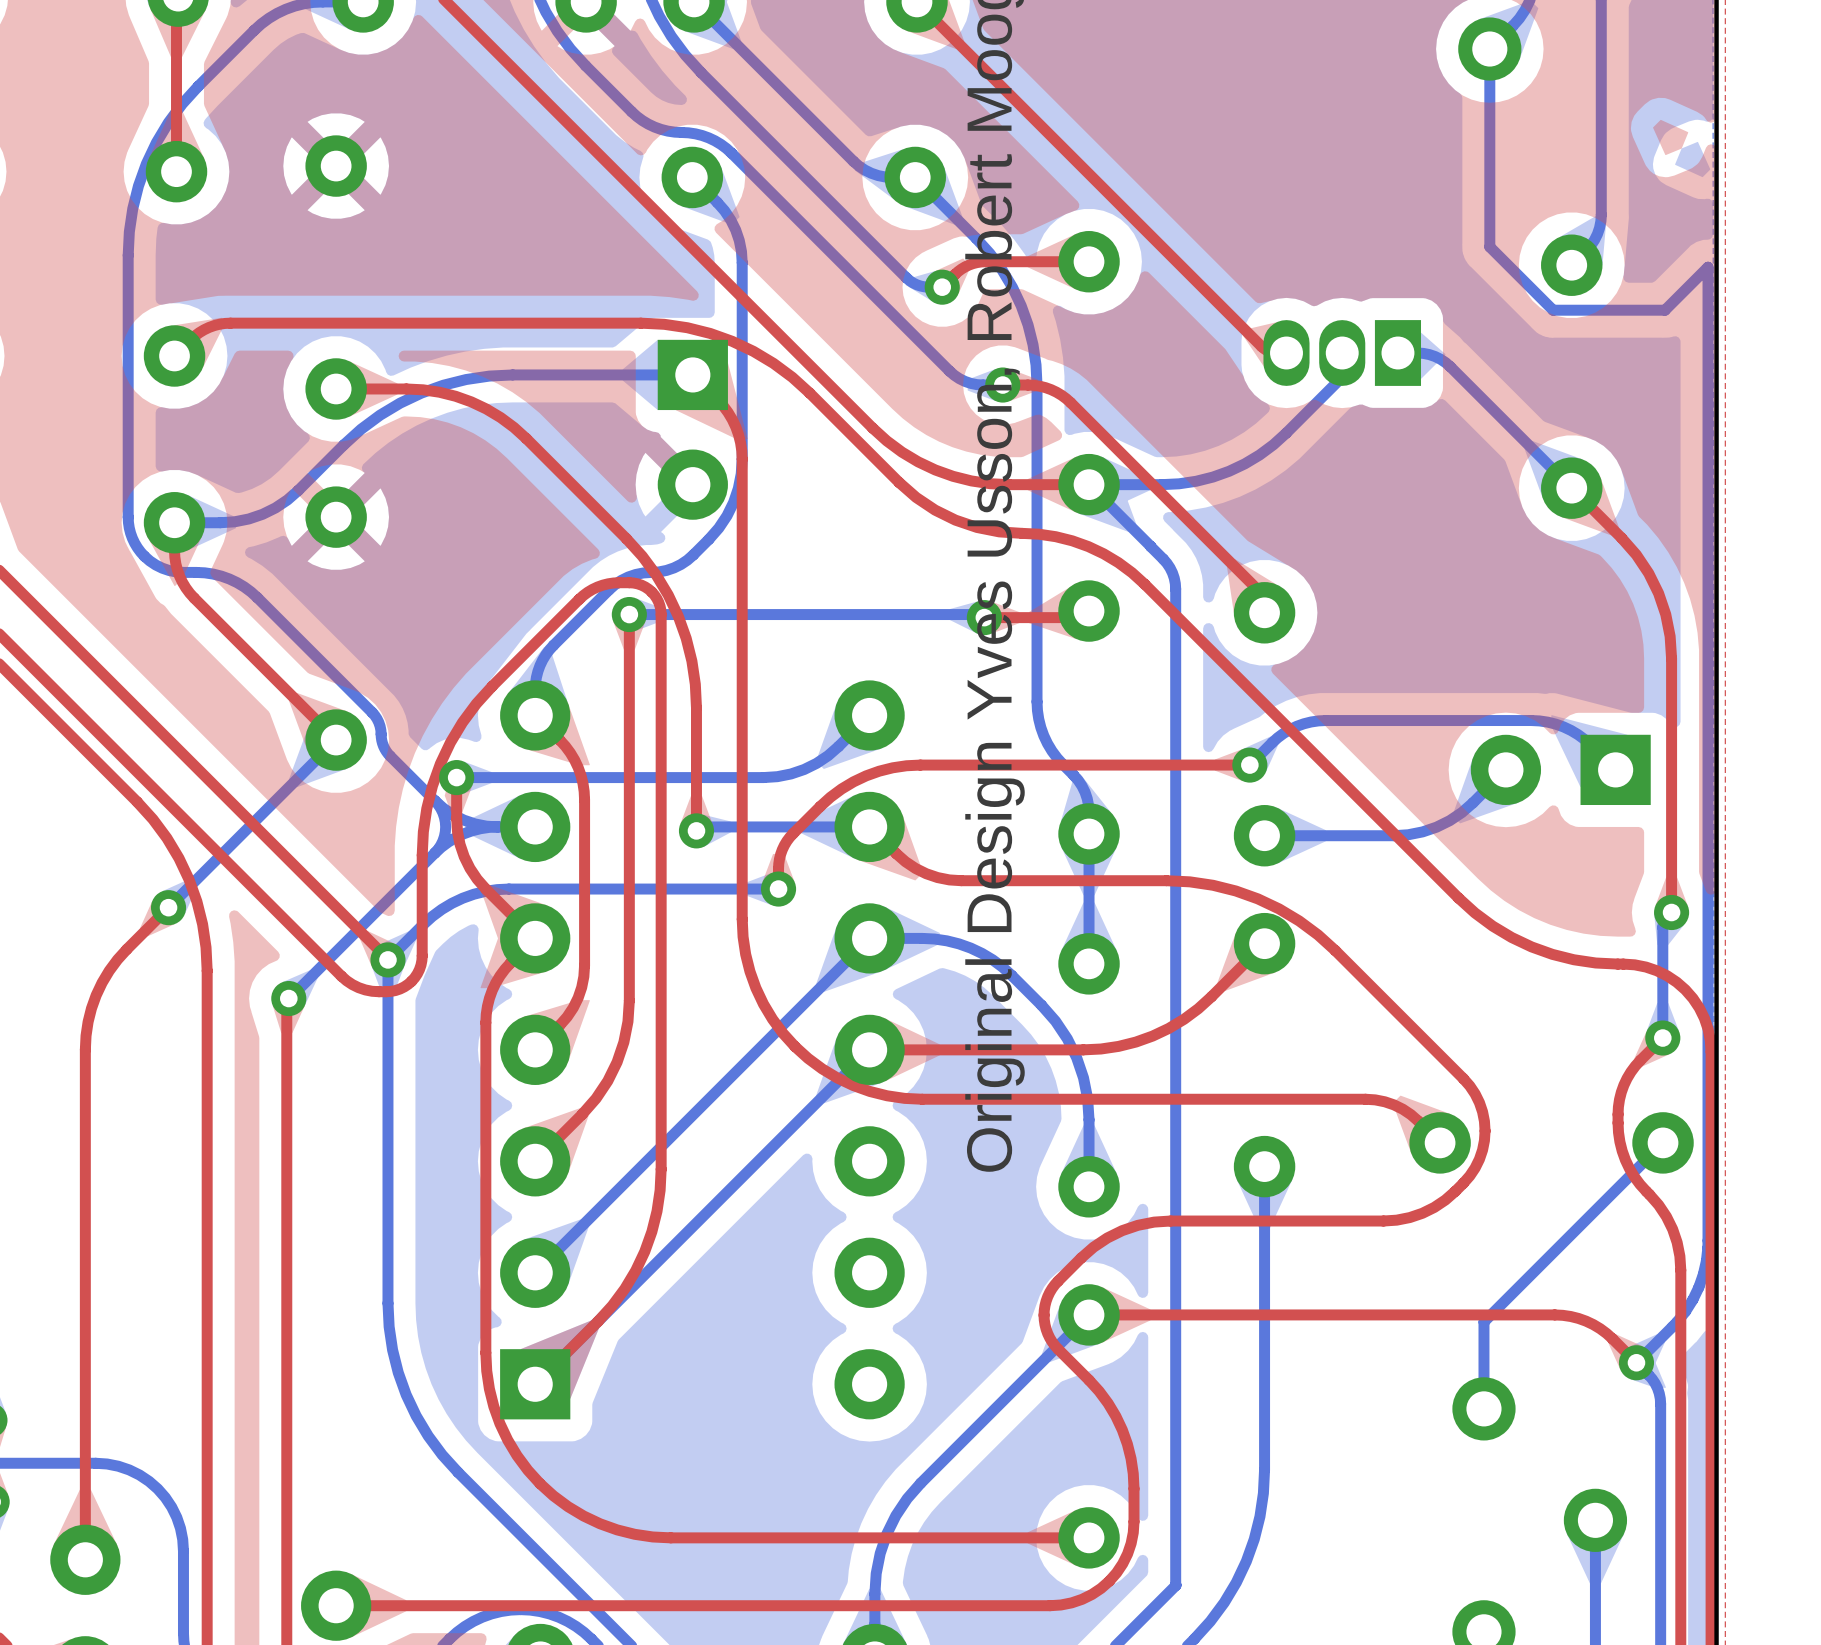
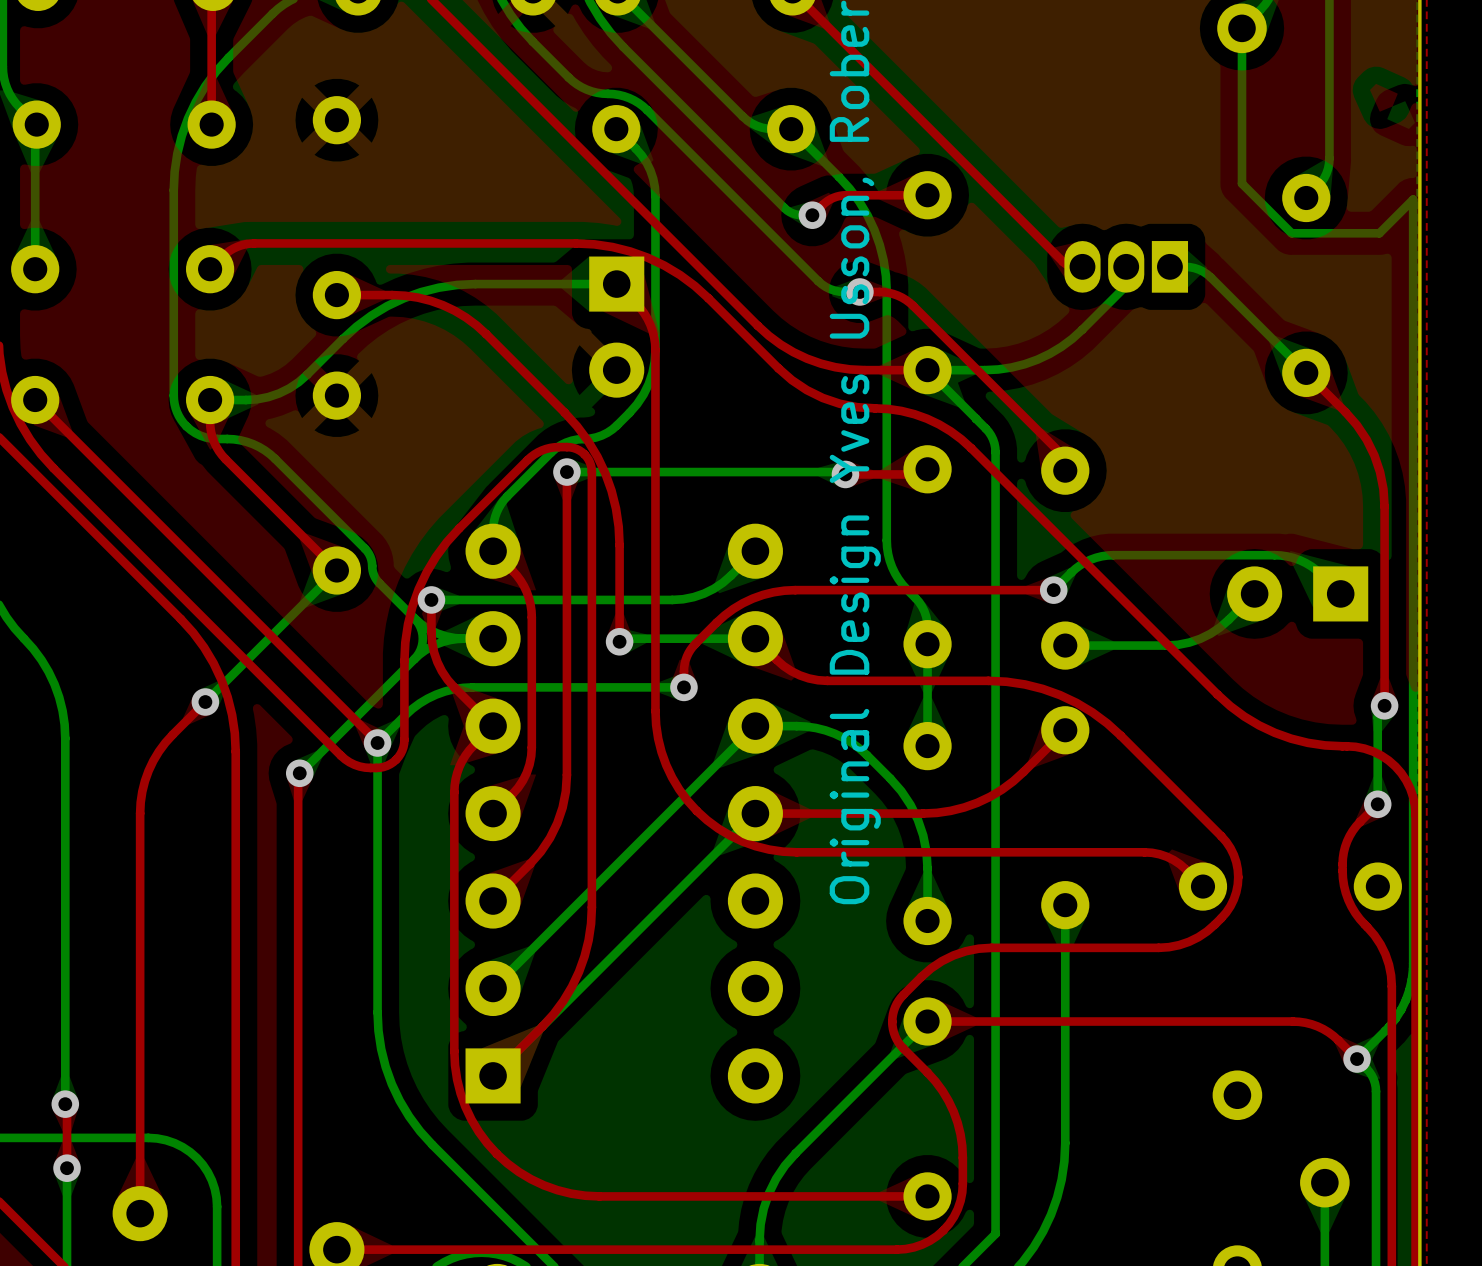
bottom track: (1663, 1142) (1483, 1321) (1483, 1408) -> none

